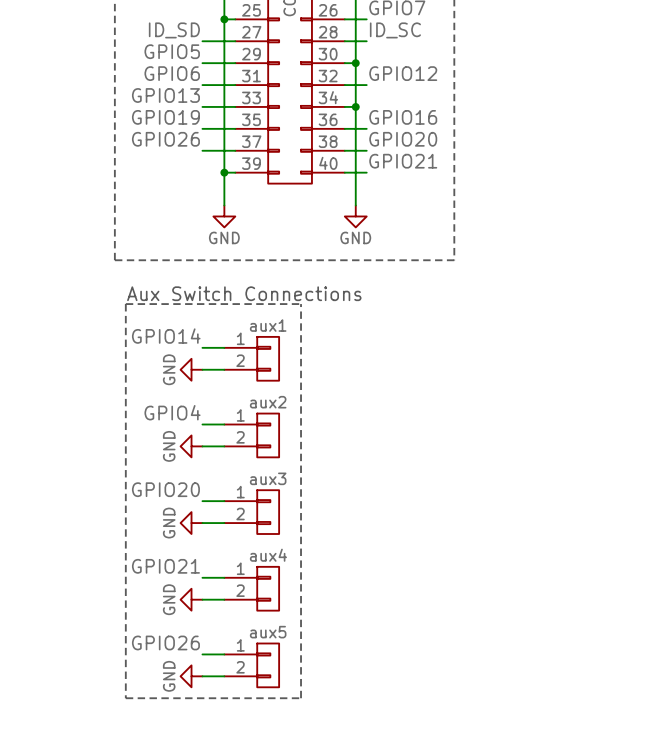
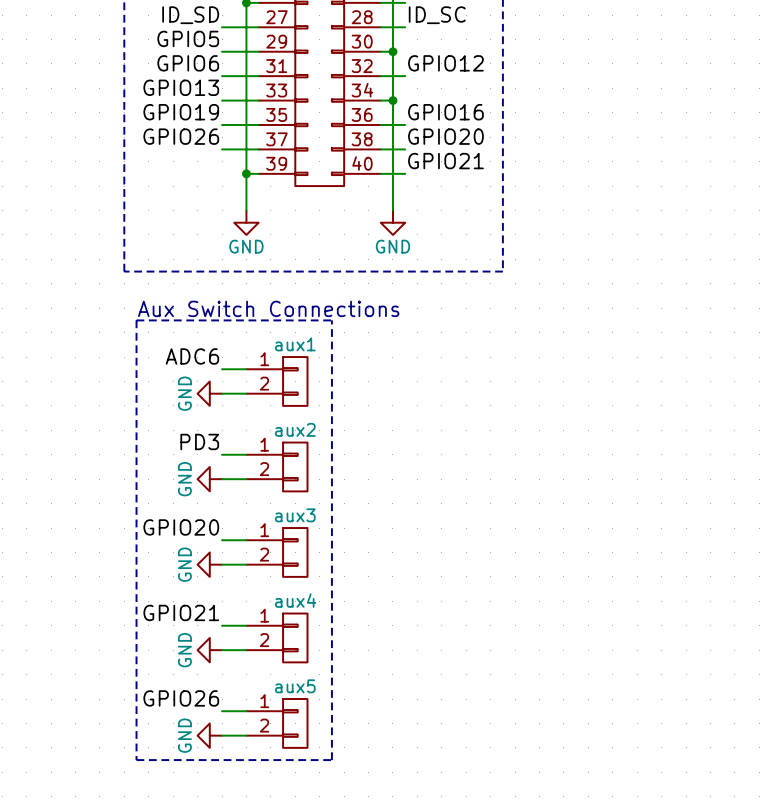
label: GPIO14 (166, 336) -> ADC6 (192, 356)
label: GPIO4 (172, 412) -> PD3 (199, 441)

